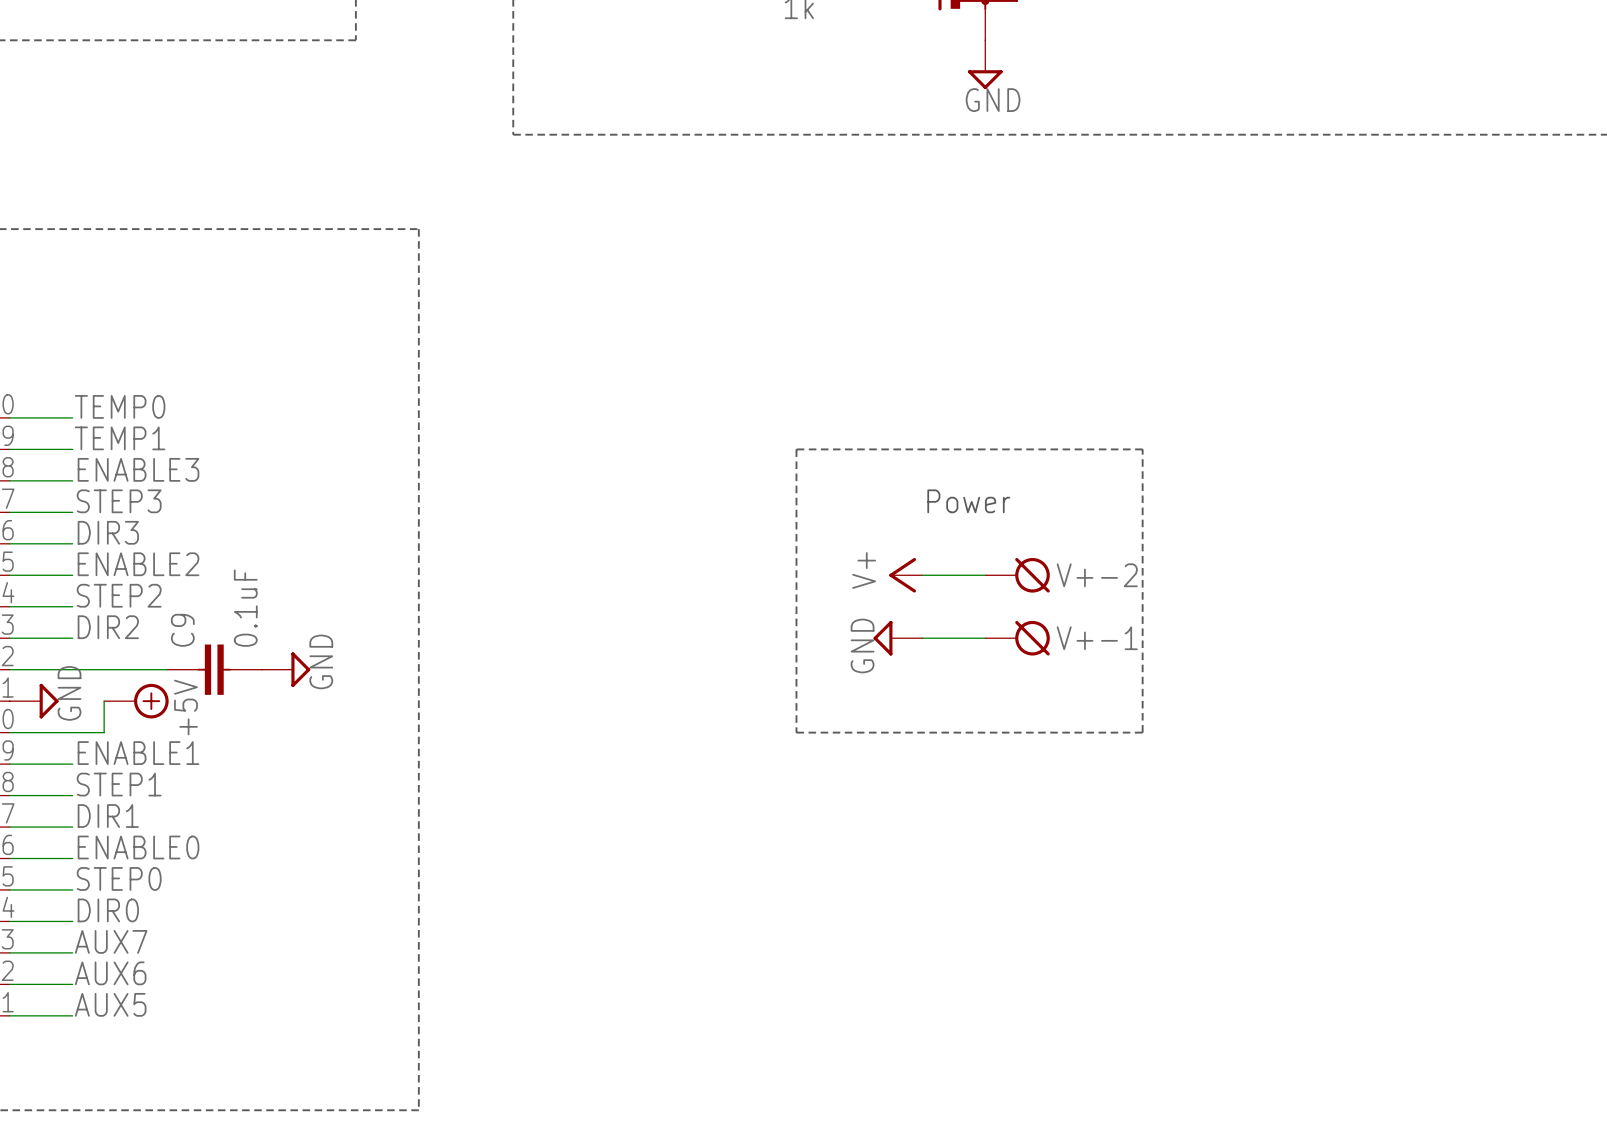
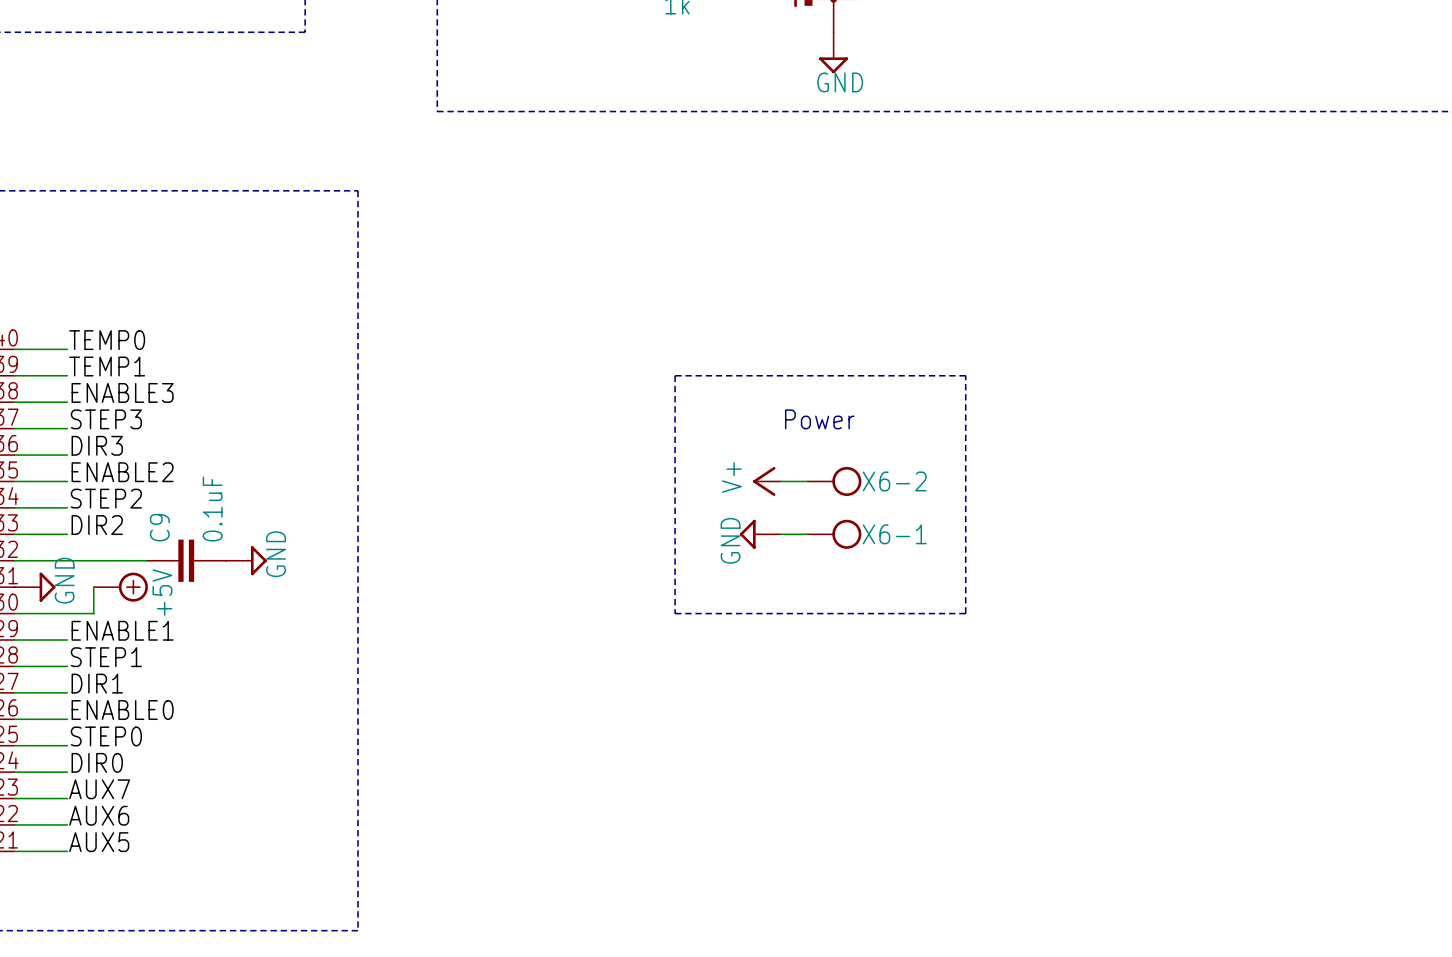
X6-2: none -> (834, 481)
V+-2: (1017, 575) -> none
X6-1: none -> (834, 534)
V+-1: (1017, 638) -> none

